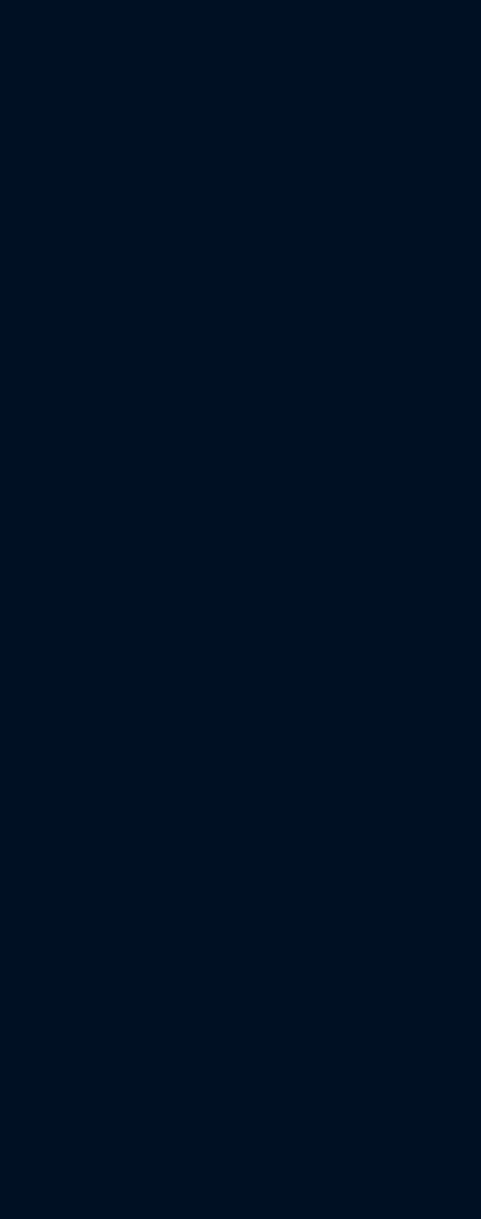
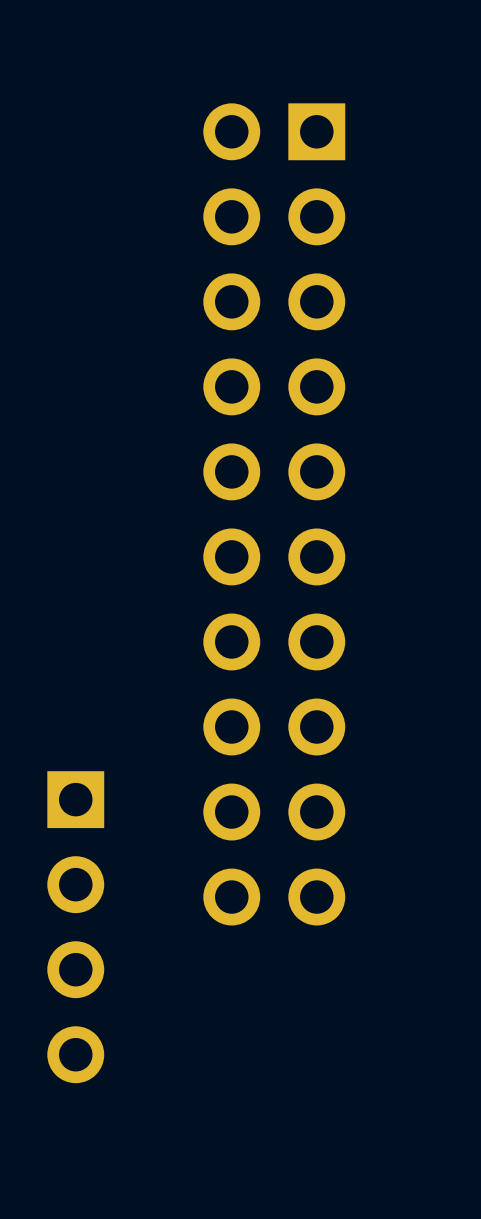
part: none -> (274, 514)
part: none -> (75, 927)

